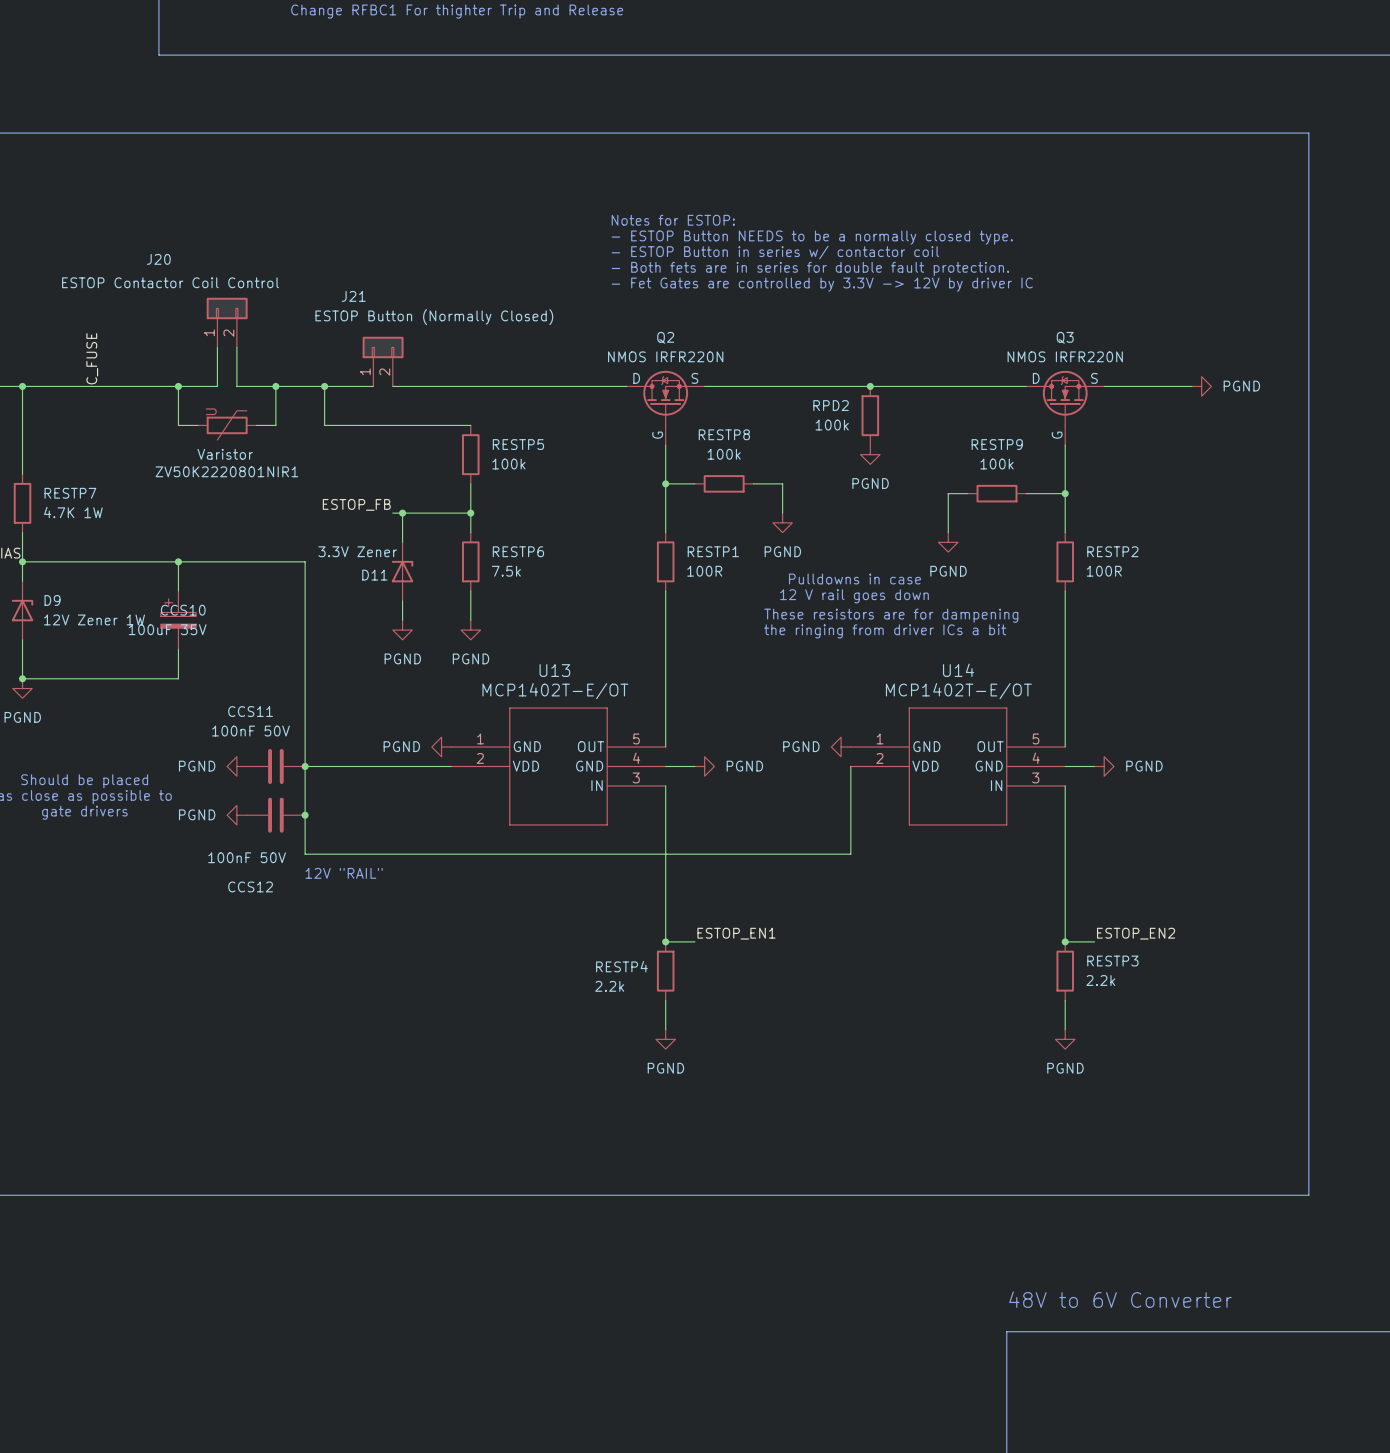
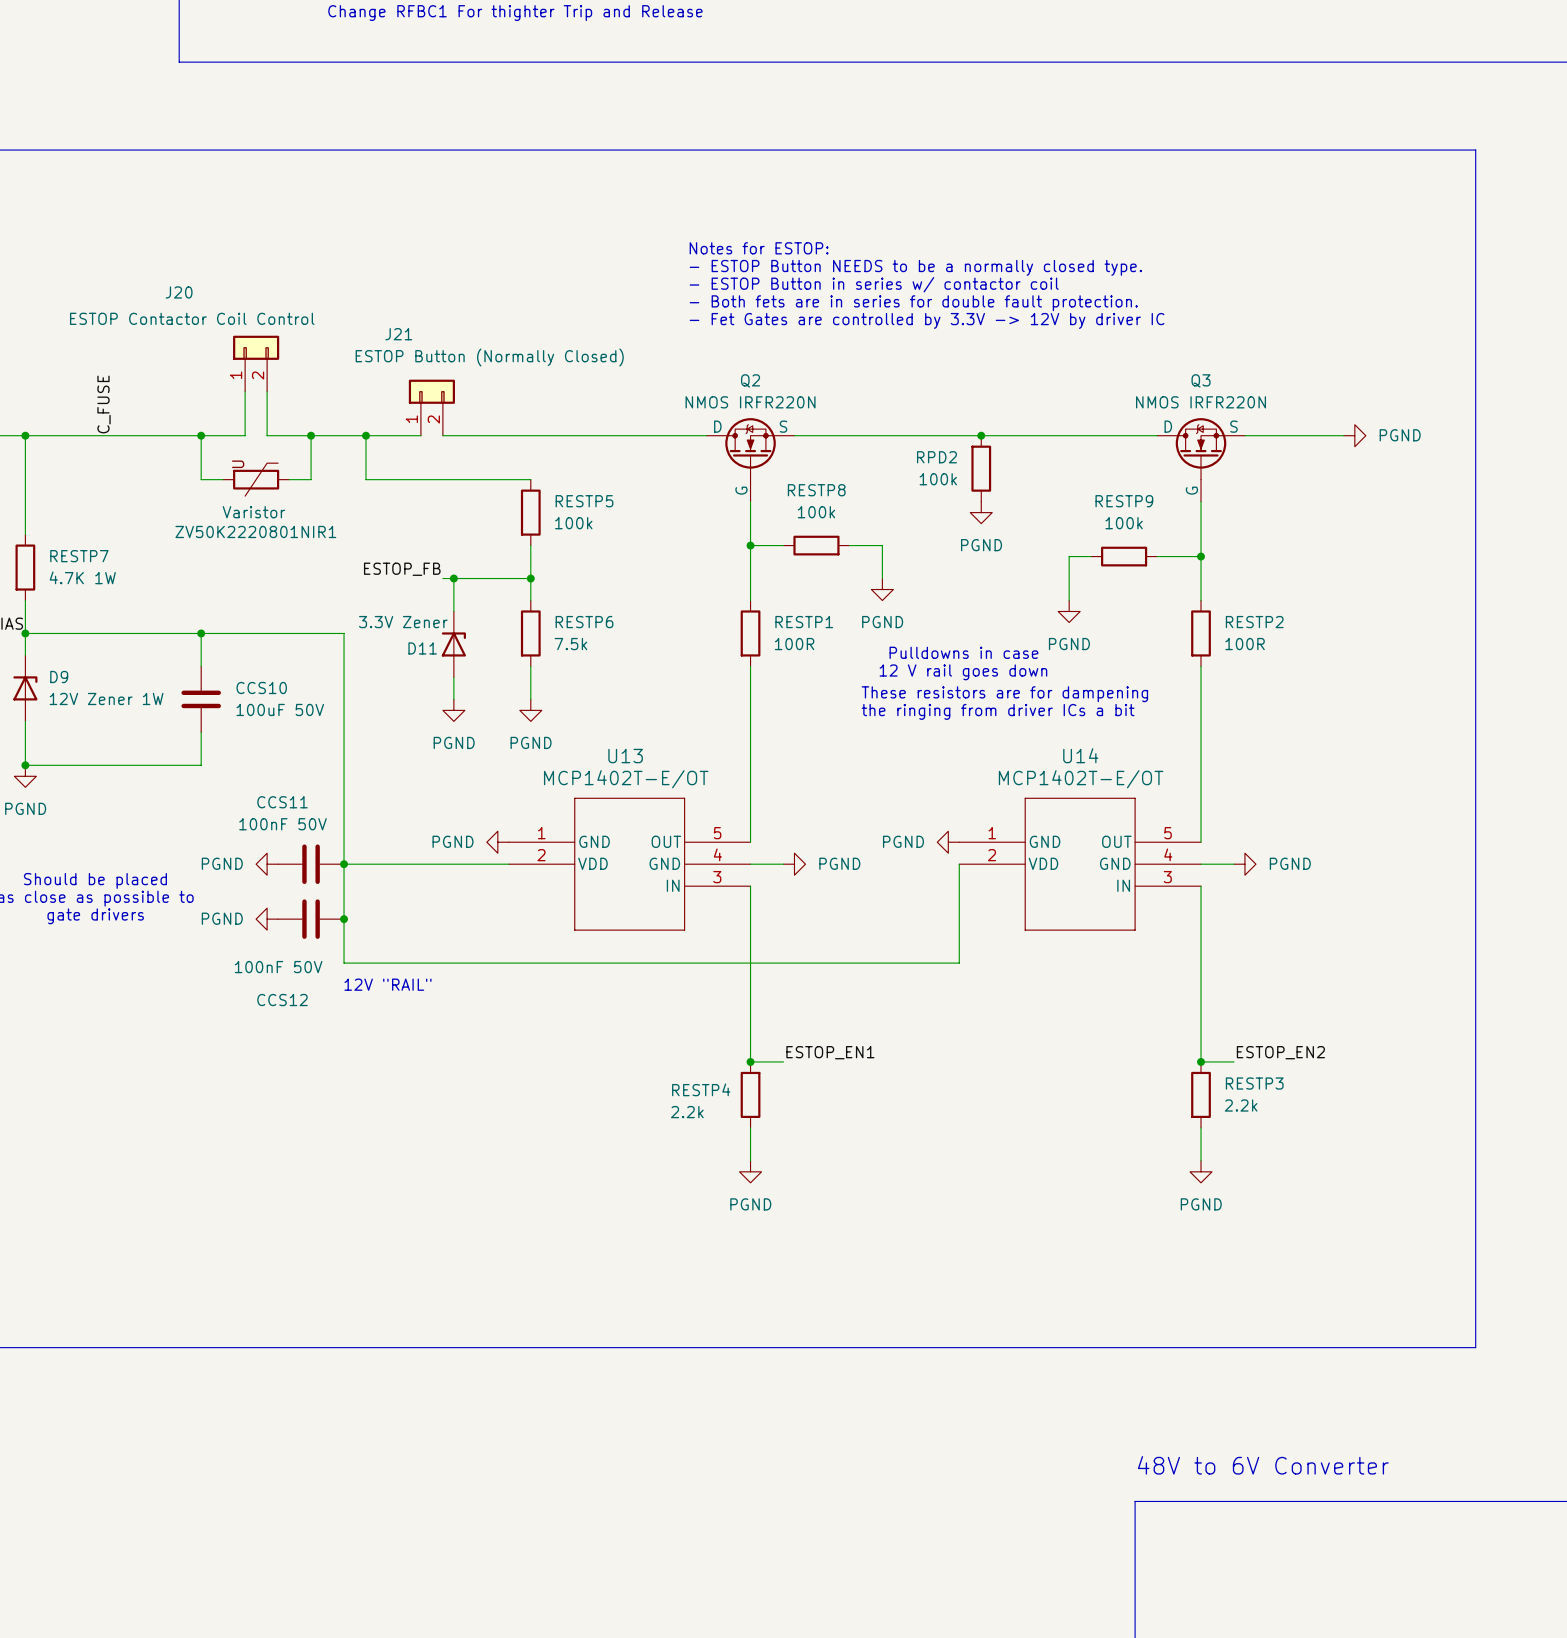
CCS10 symbol: [160, 591, 196, 650] -> [181, 666, 221, 733]
CCS10 name position: CCS10 (183, 610) -> CCS10 (261, 687)
CCS10 value: 100uF 35V (167, 629) -> 100uF 50V (280, 709)

